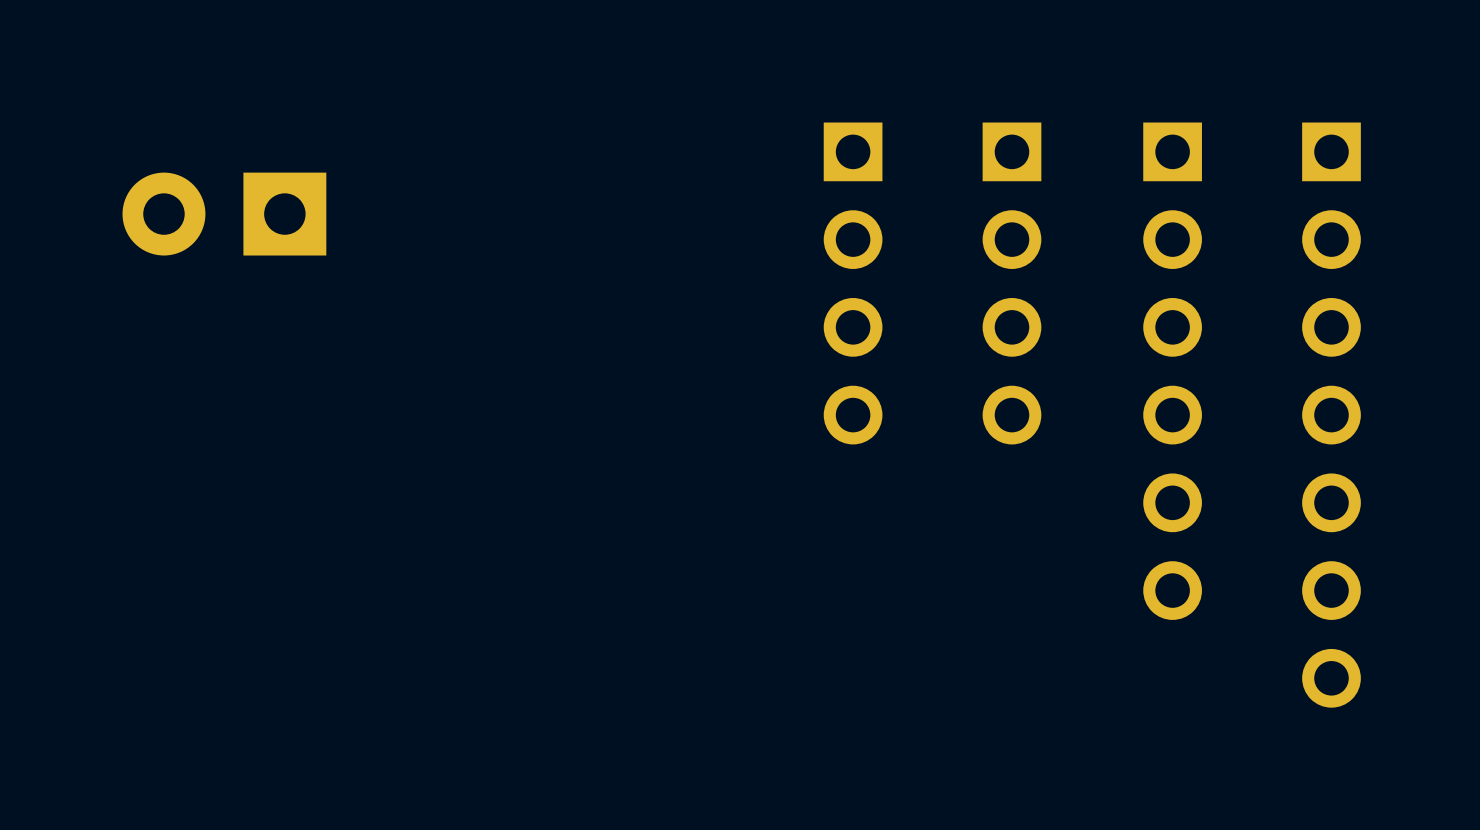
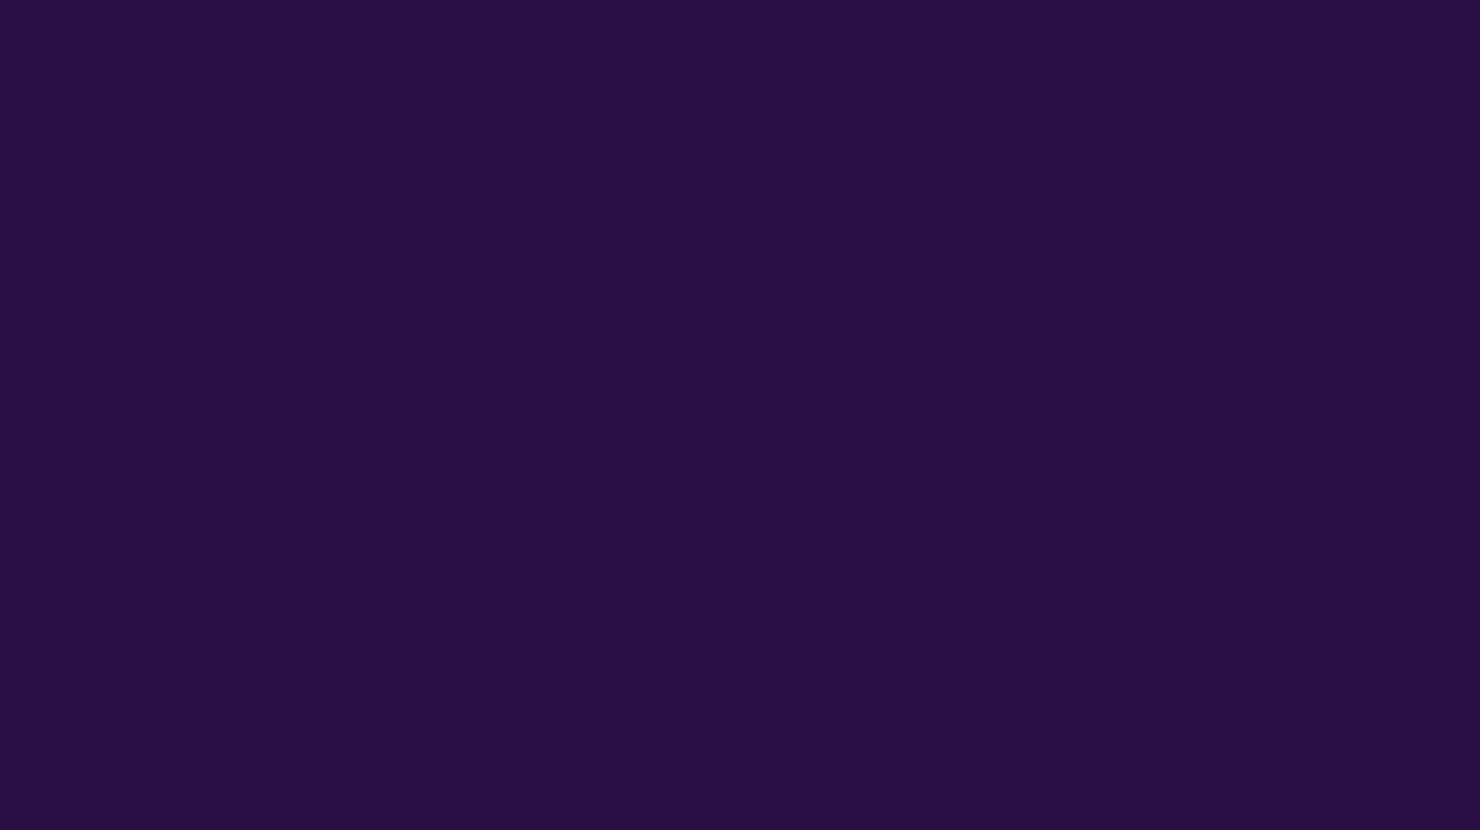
part: (224, 214) -> none
part: (853, 283) -> none
part: (1011, 283) -> none
part: (1172, 371) -> none
part: (1331, 415) -> none

